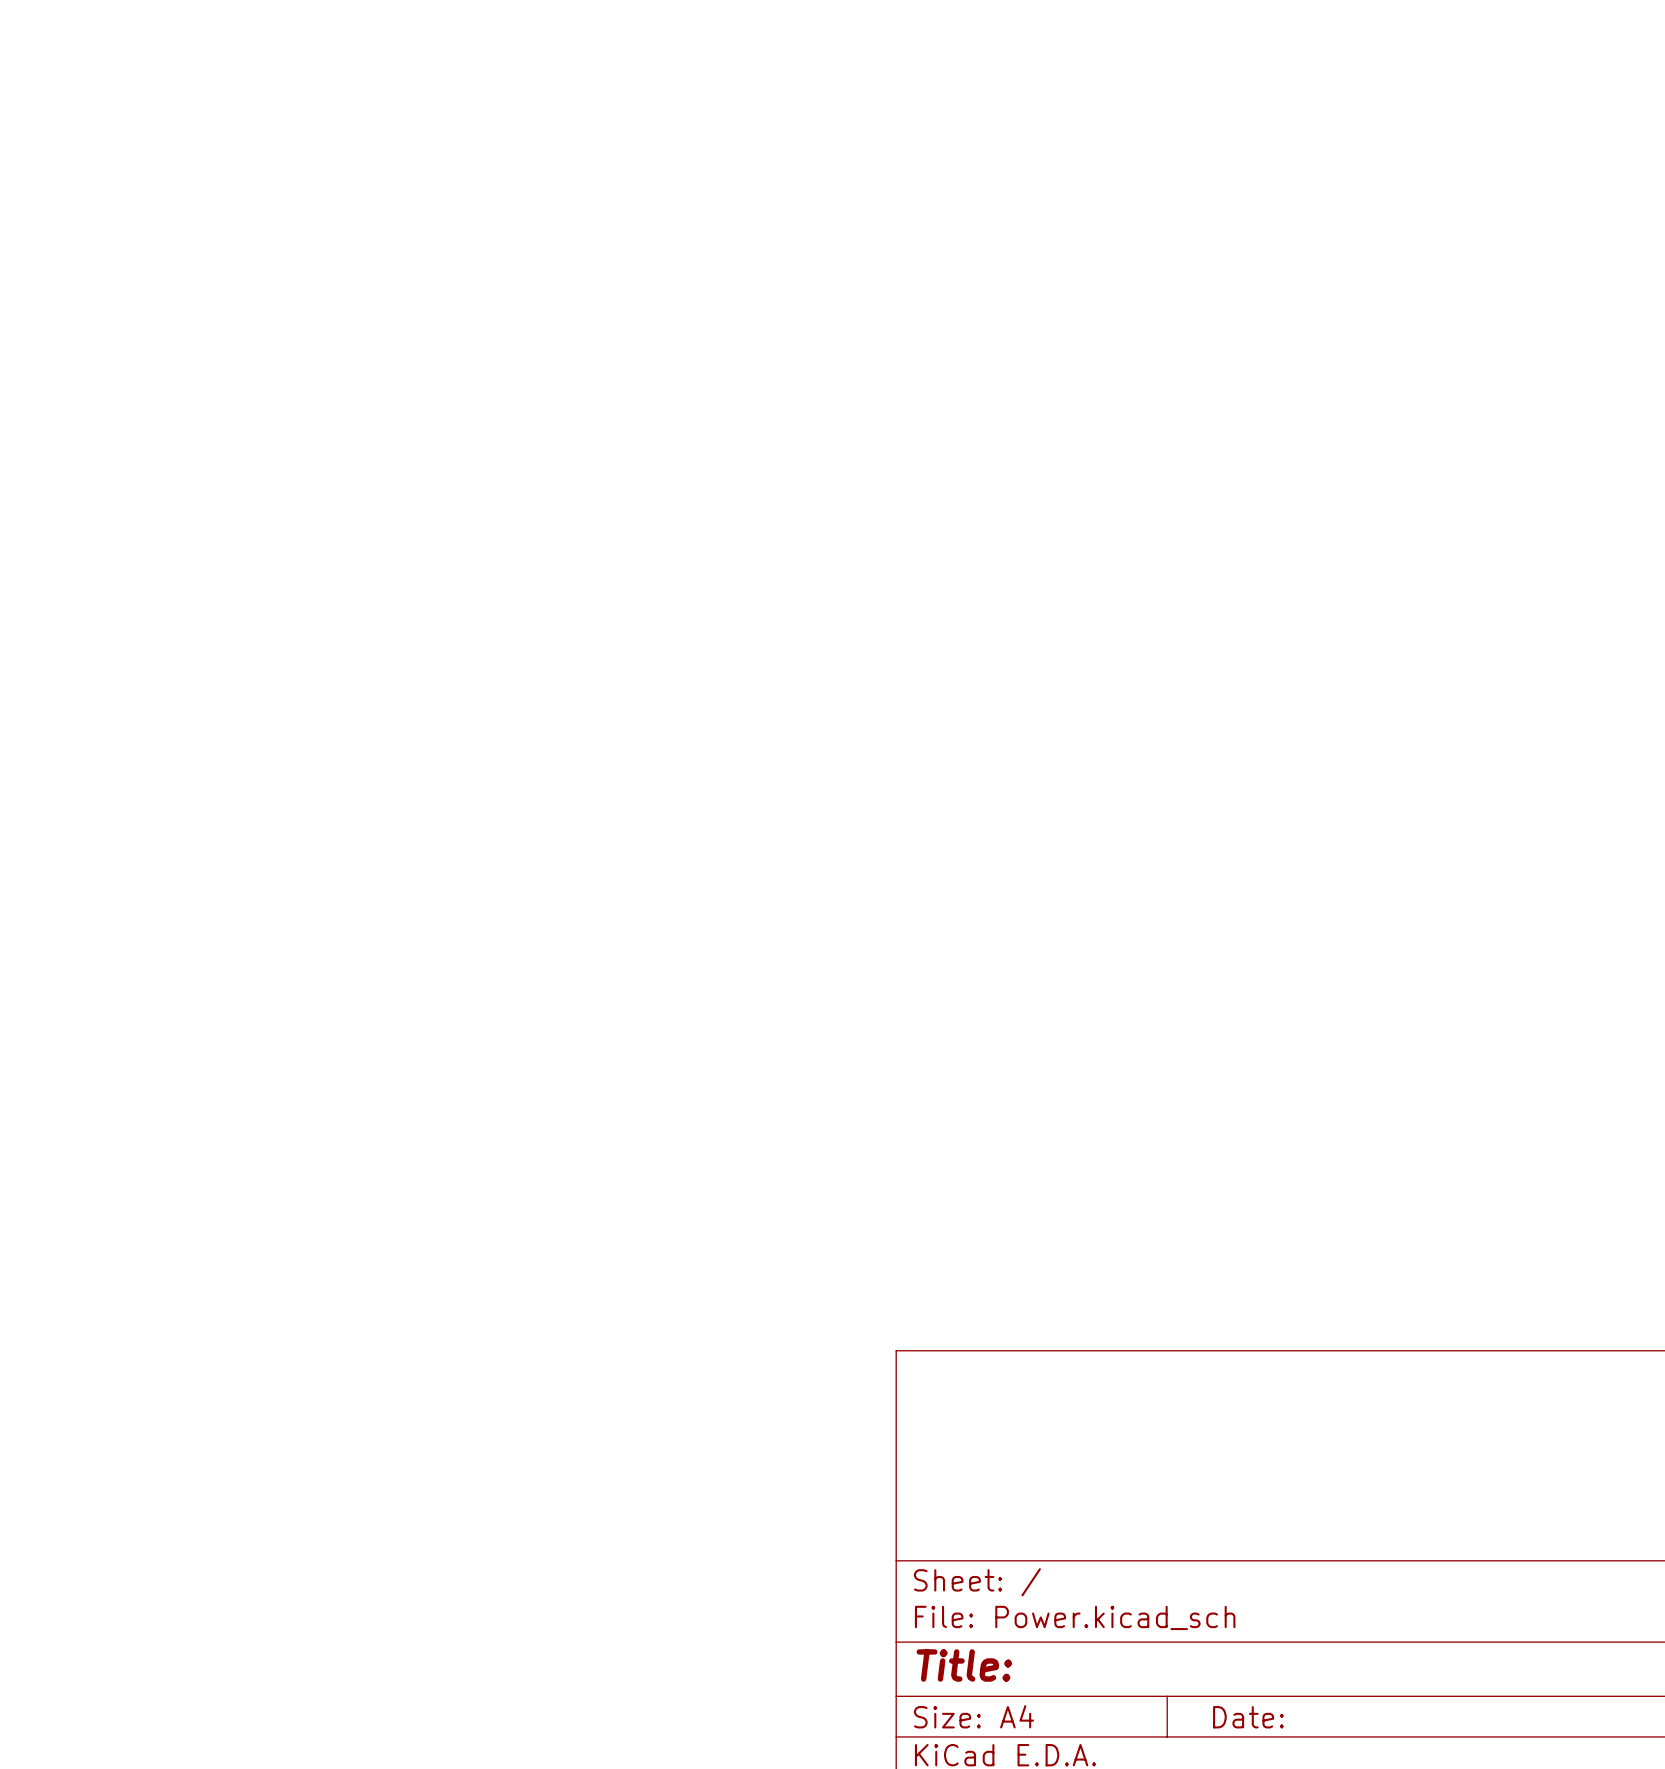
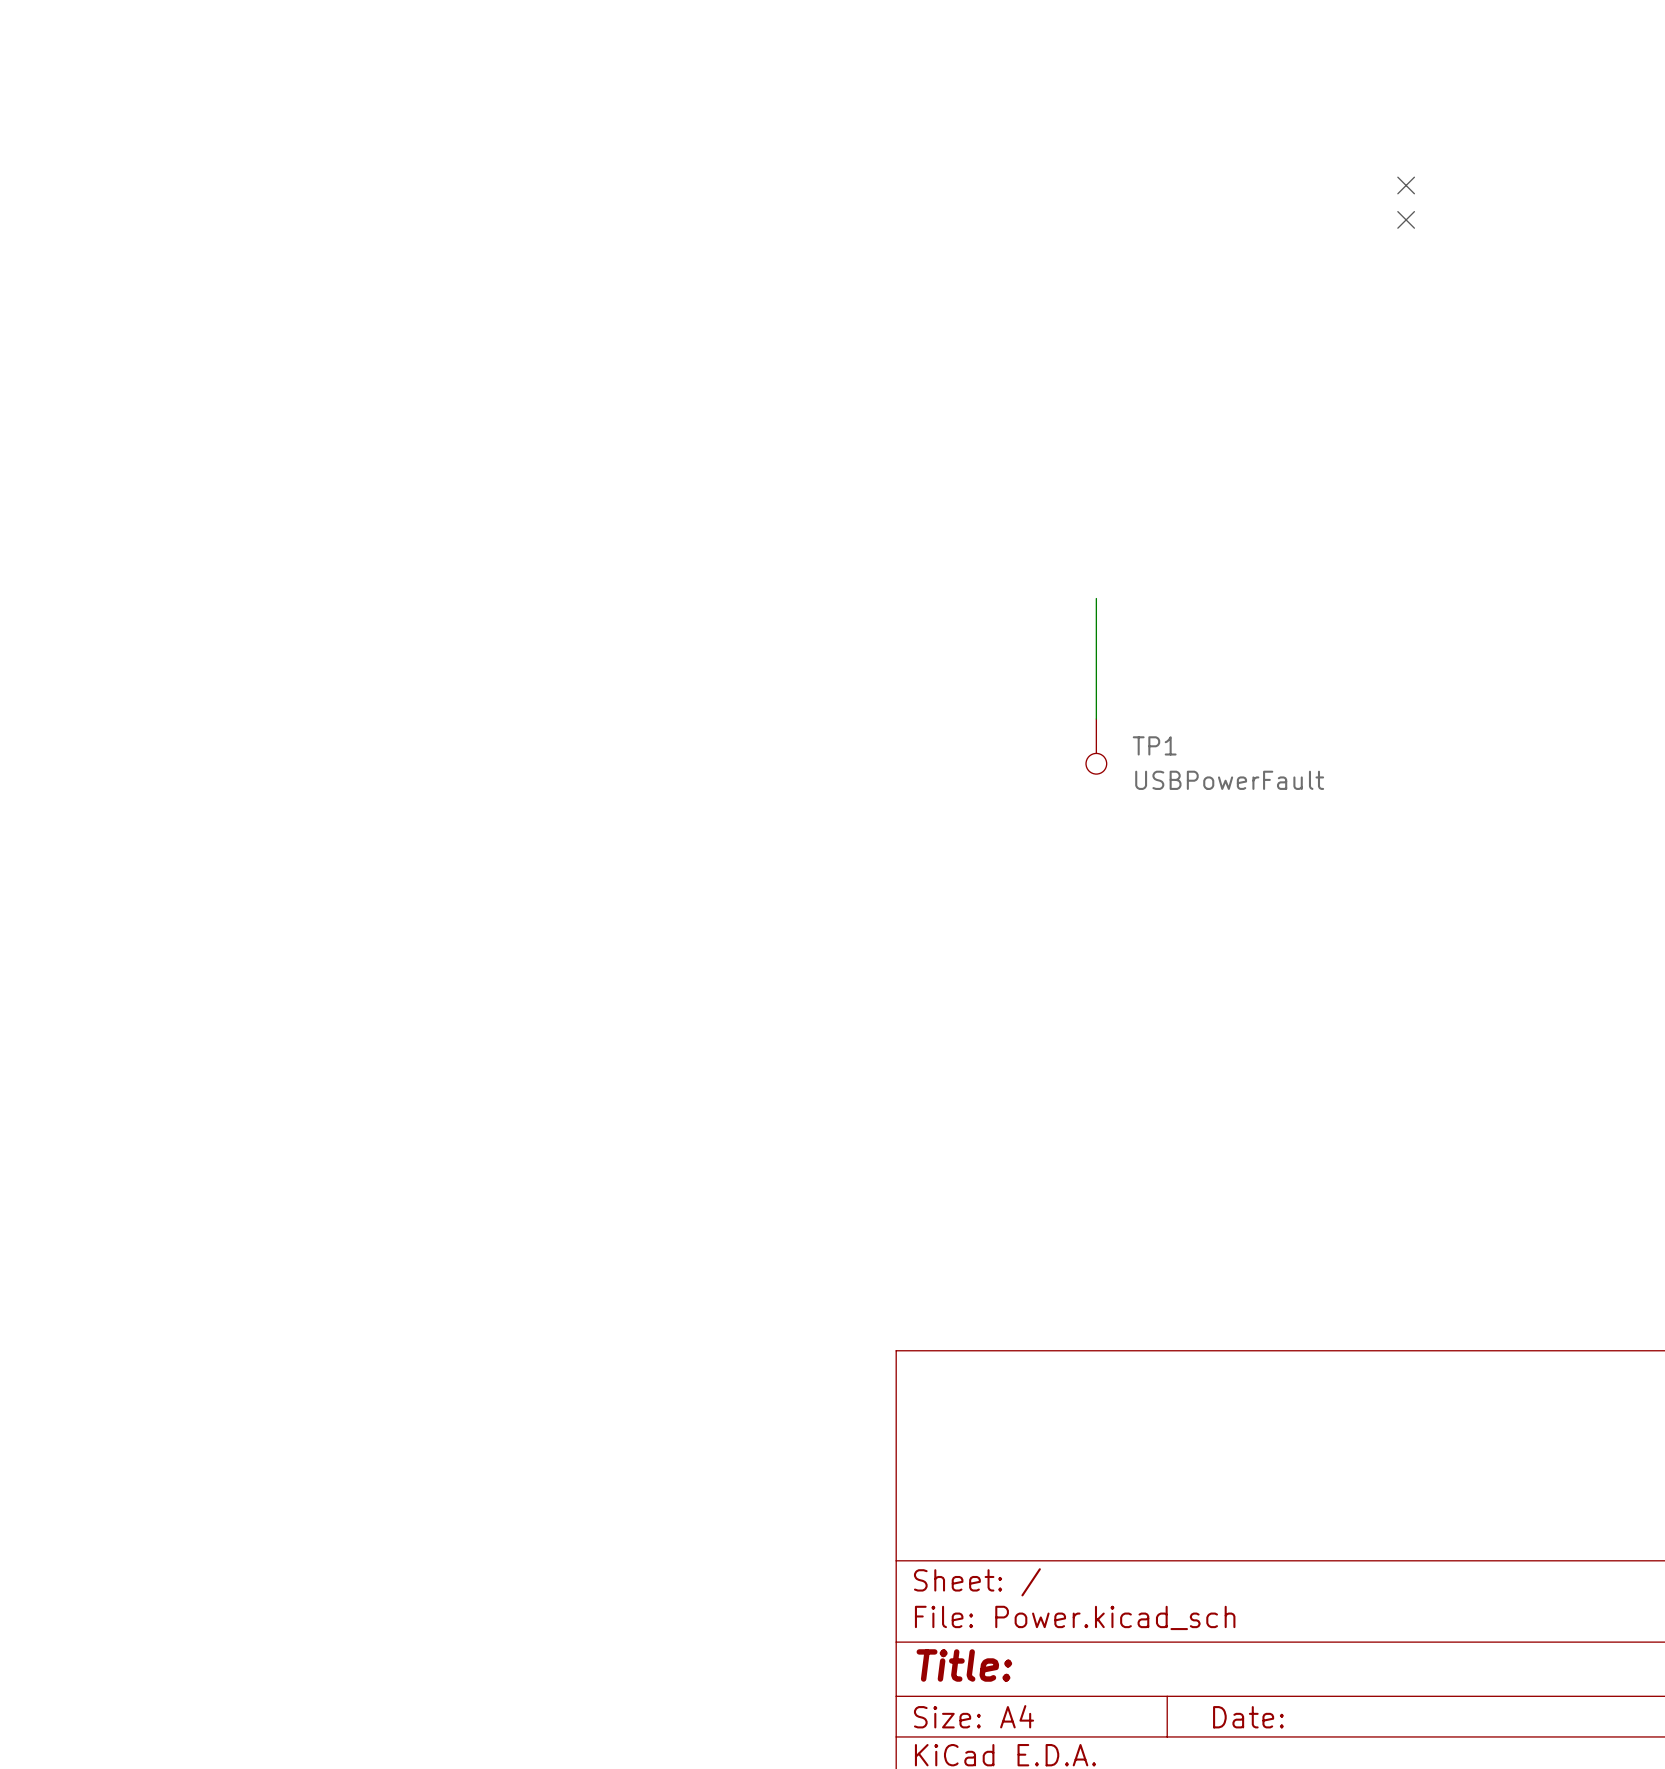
no-connect mark: none -> (1406, 185)
no-connect mark: none -> (1406, 219)
wire: none -> (1096, 598) (1096, 719)
TP1: none -> USBPowerFault (1096, 746)

